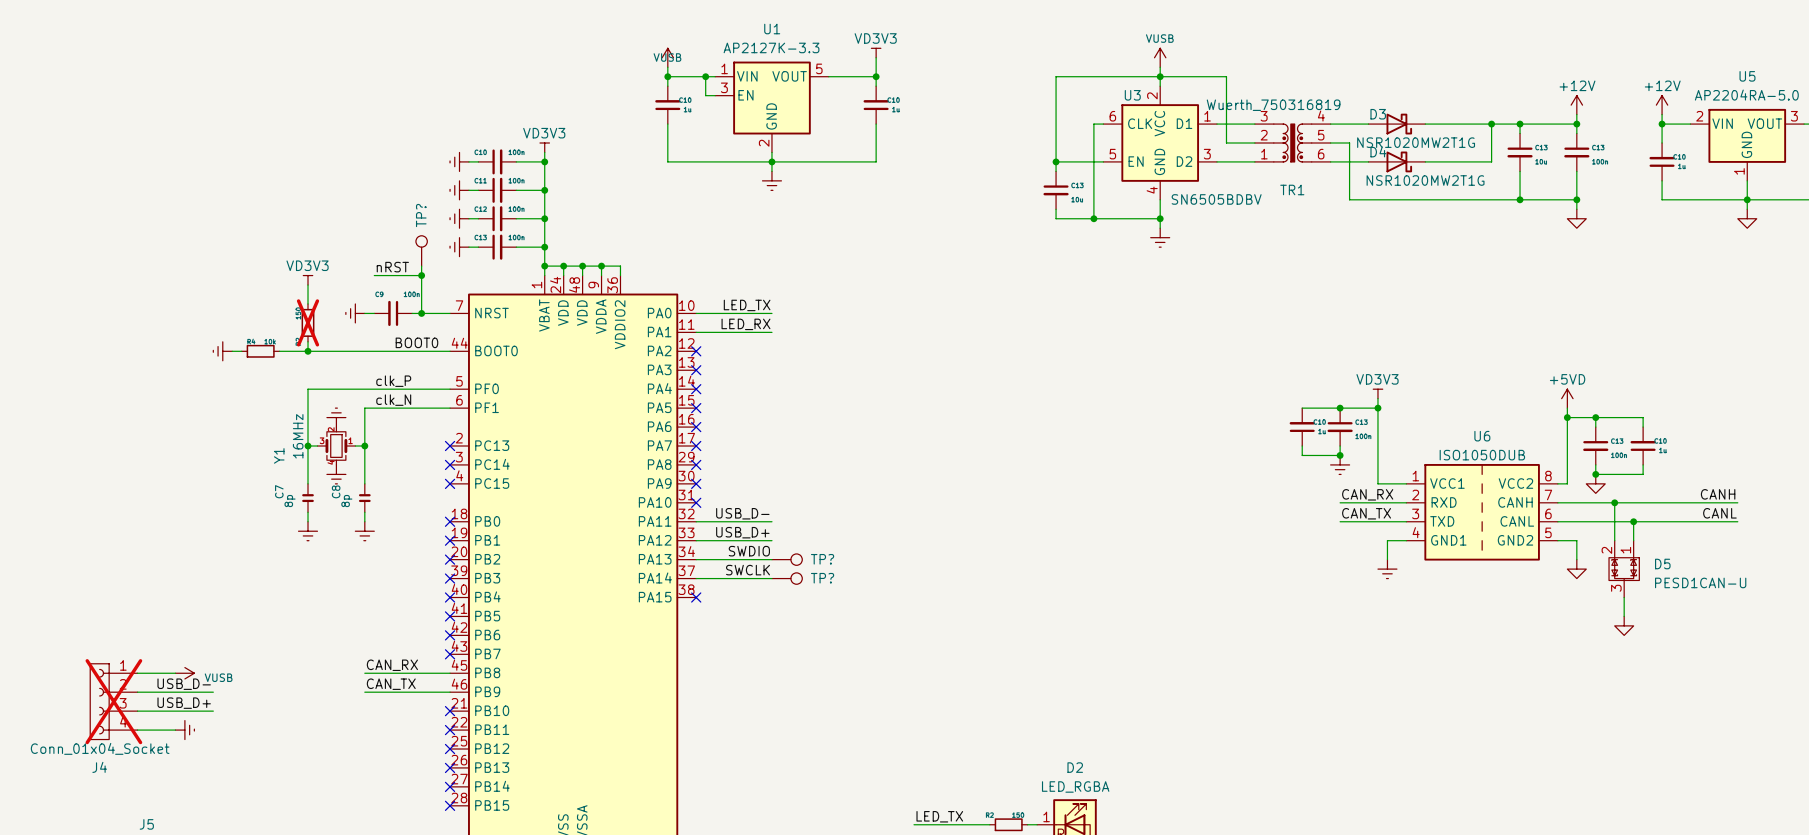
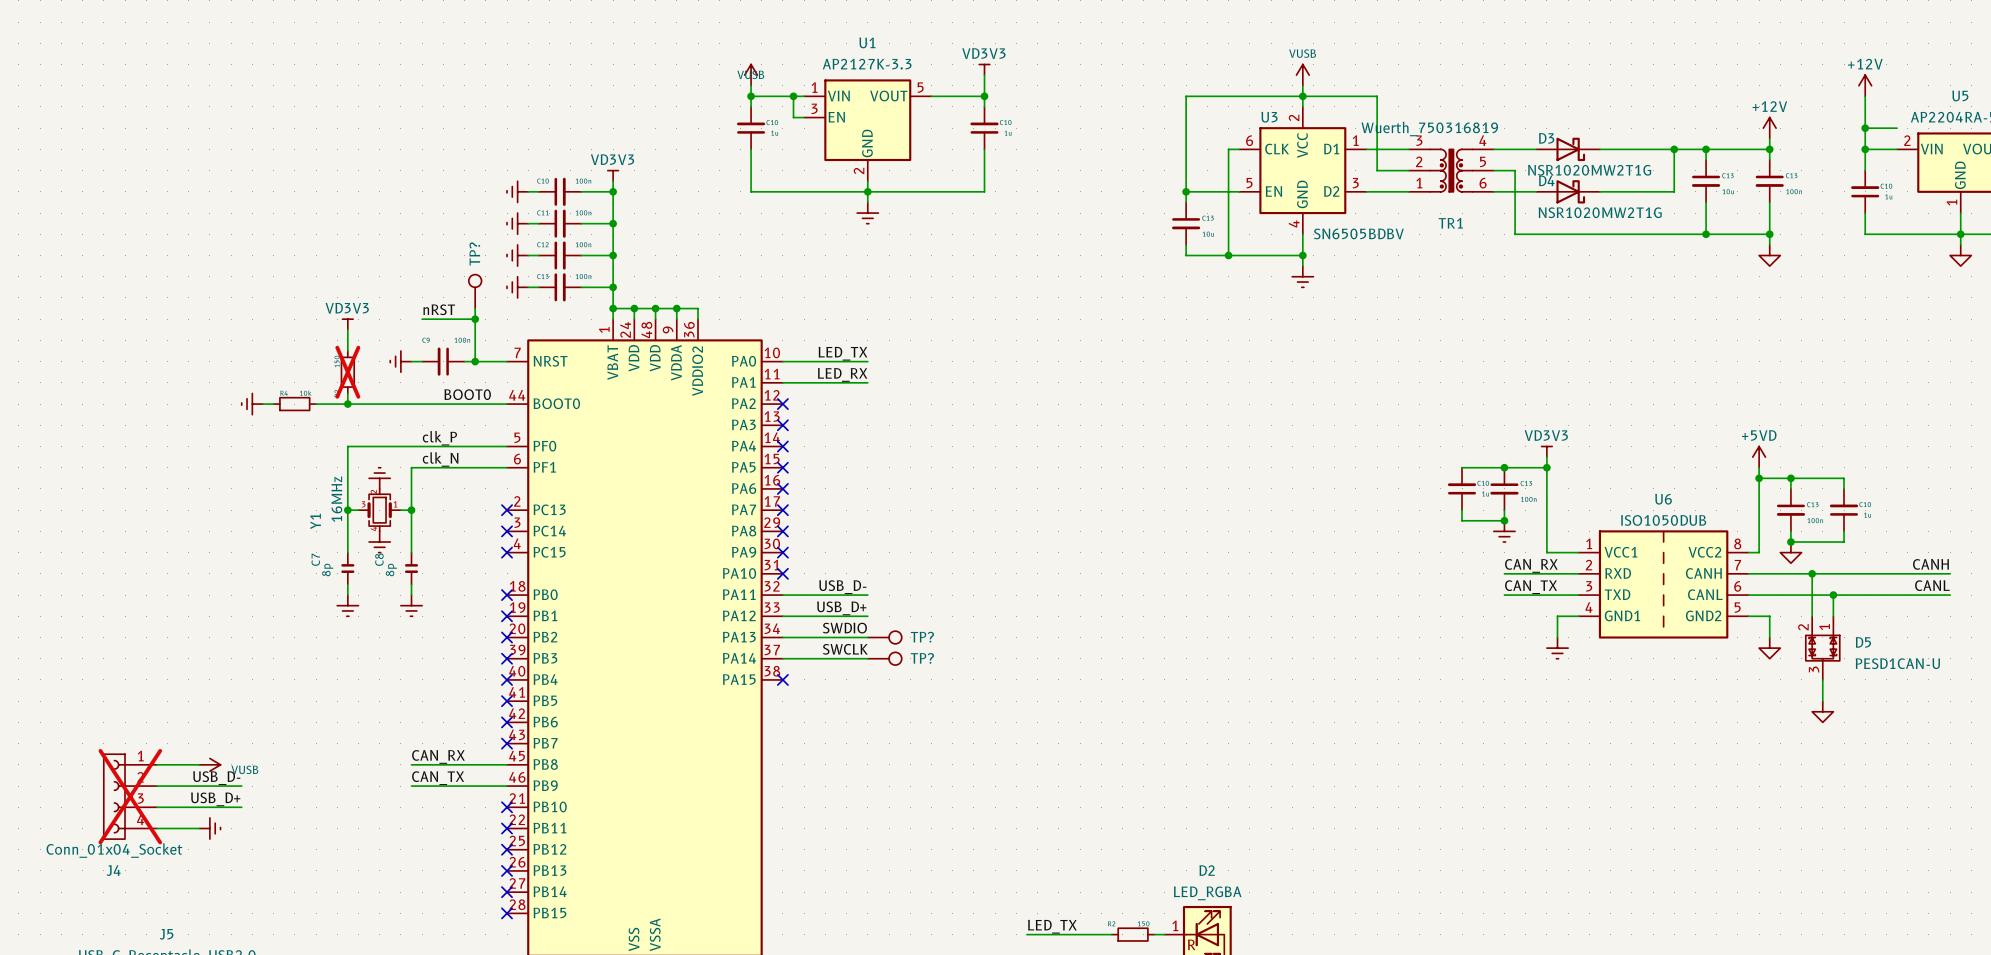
wire: none -> (1865, 128) (1897, 128)
junction: none -> (1865, 128)
power symbol position: +12V (1662, 105) -> +12V (1865, 85)

